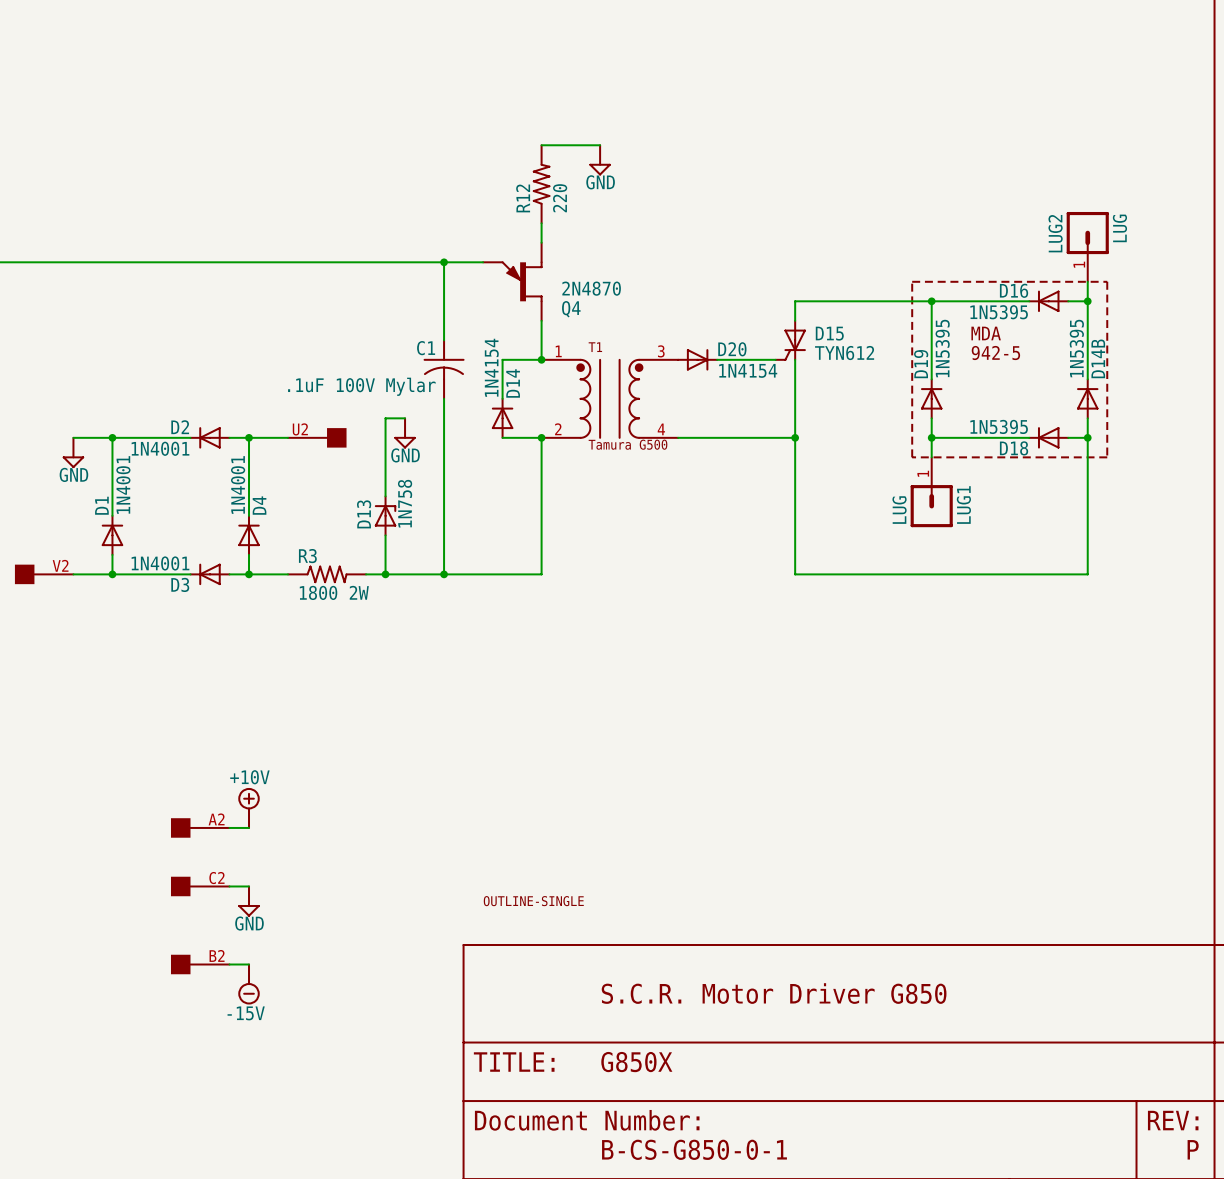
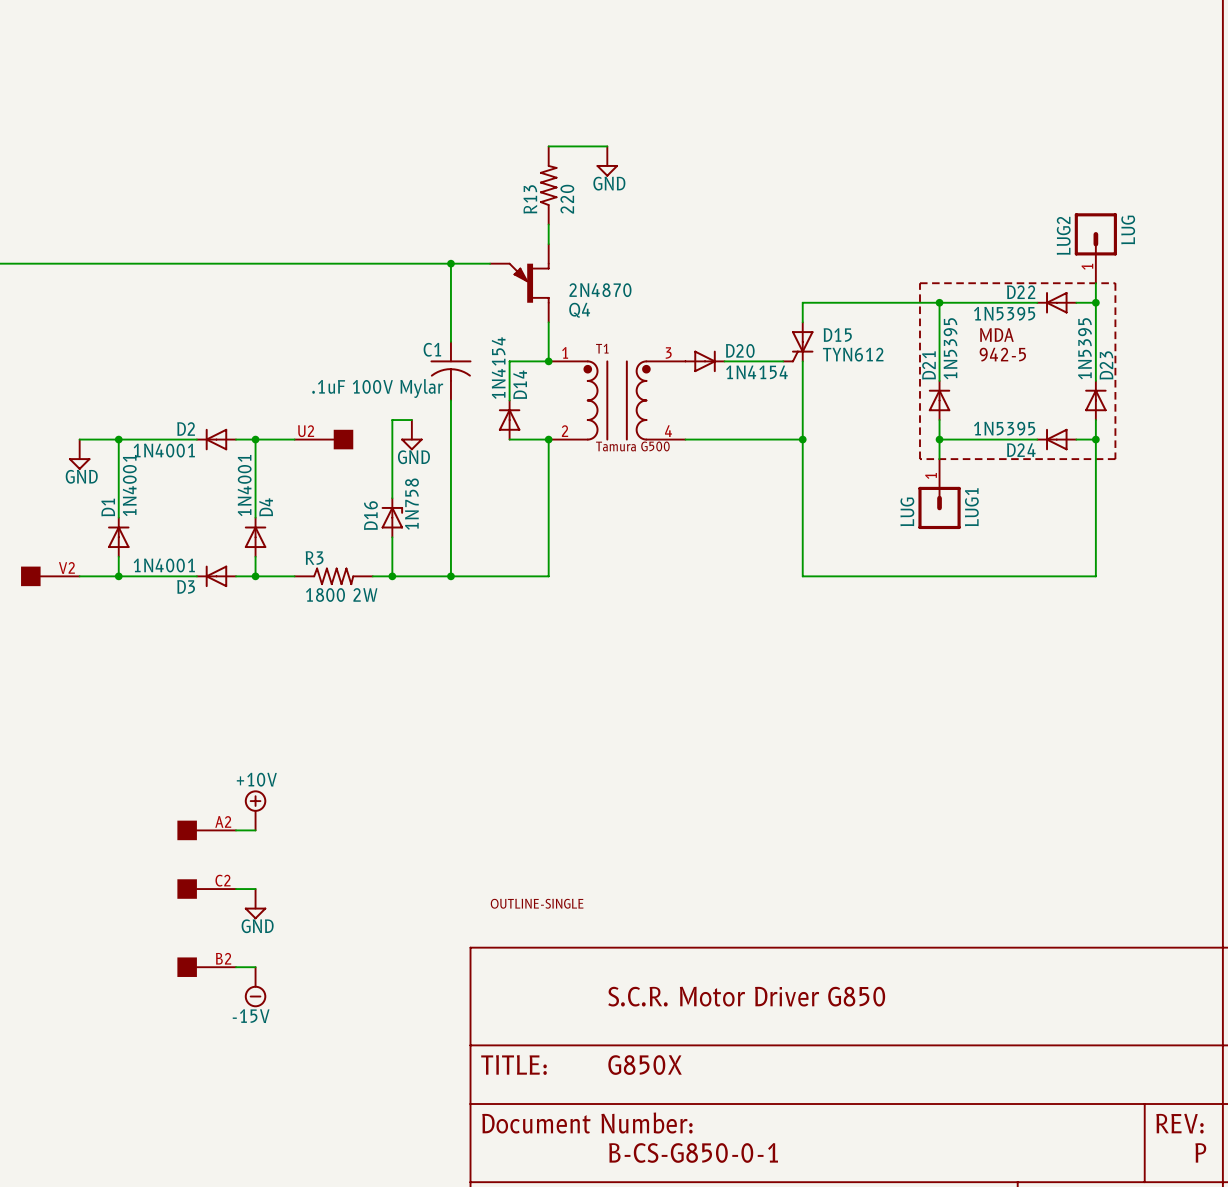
R12 name: R12 (523, 198) -> R13 (530, 199)
D16 name: D16 (1014, 290) -> D22 (1021, 292)
D14B name: D14B (1098, 358) -> D23 (1106, 365)
D19 name: D19 (921, 364) -> D21 (928, 365)
D18 name: D18 (1014, 448) -> D24 (1021, 450)
D13 name: D13 (364, 514) -> D16 (370, 515)

